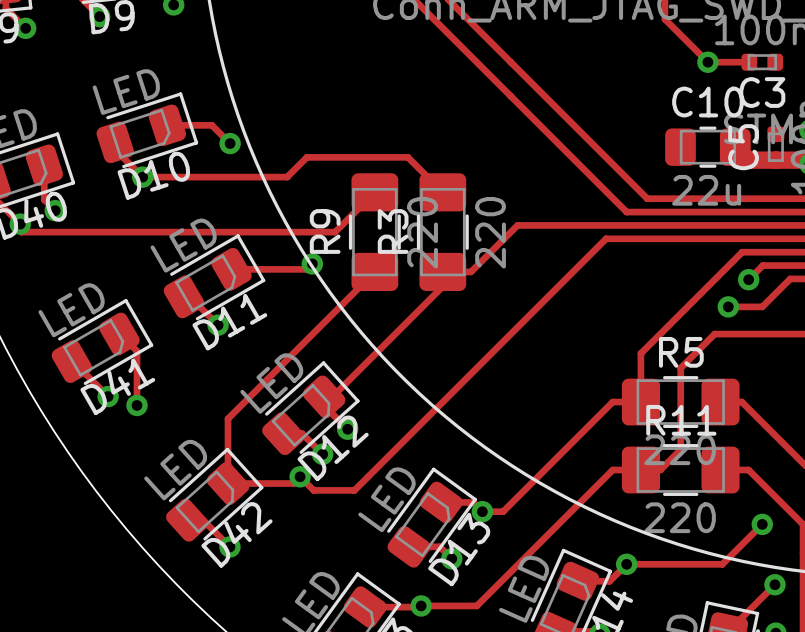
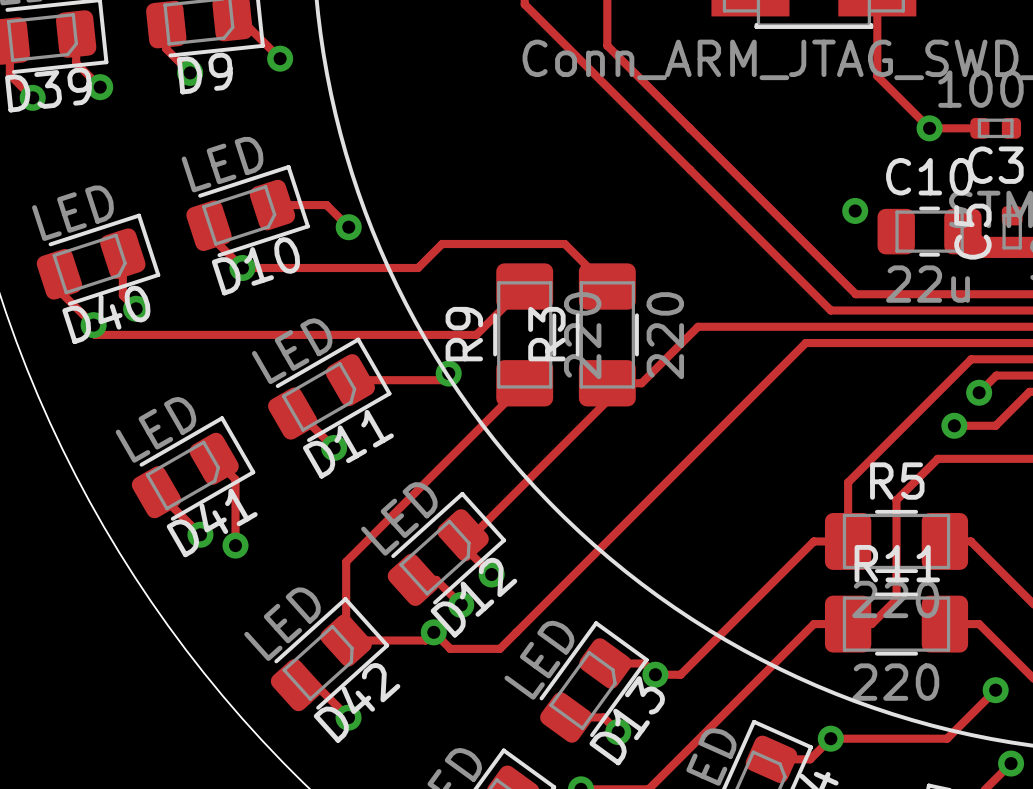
via: none -> (855, 210)

